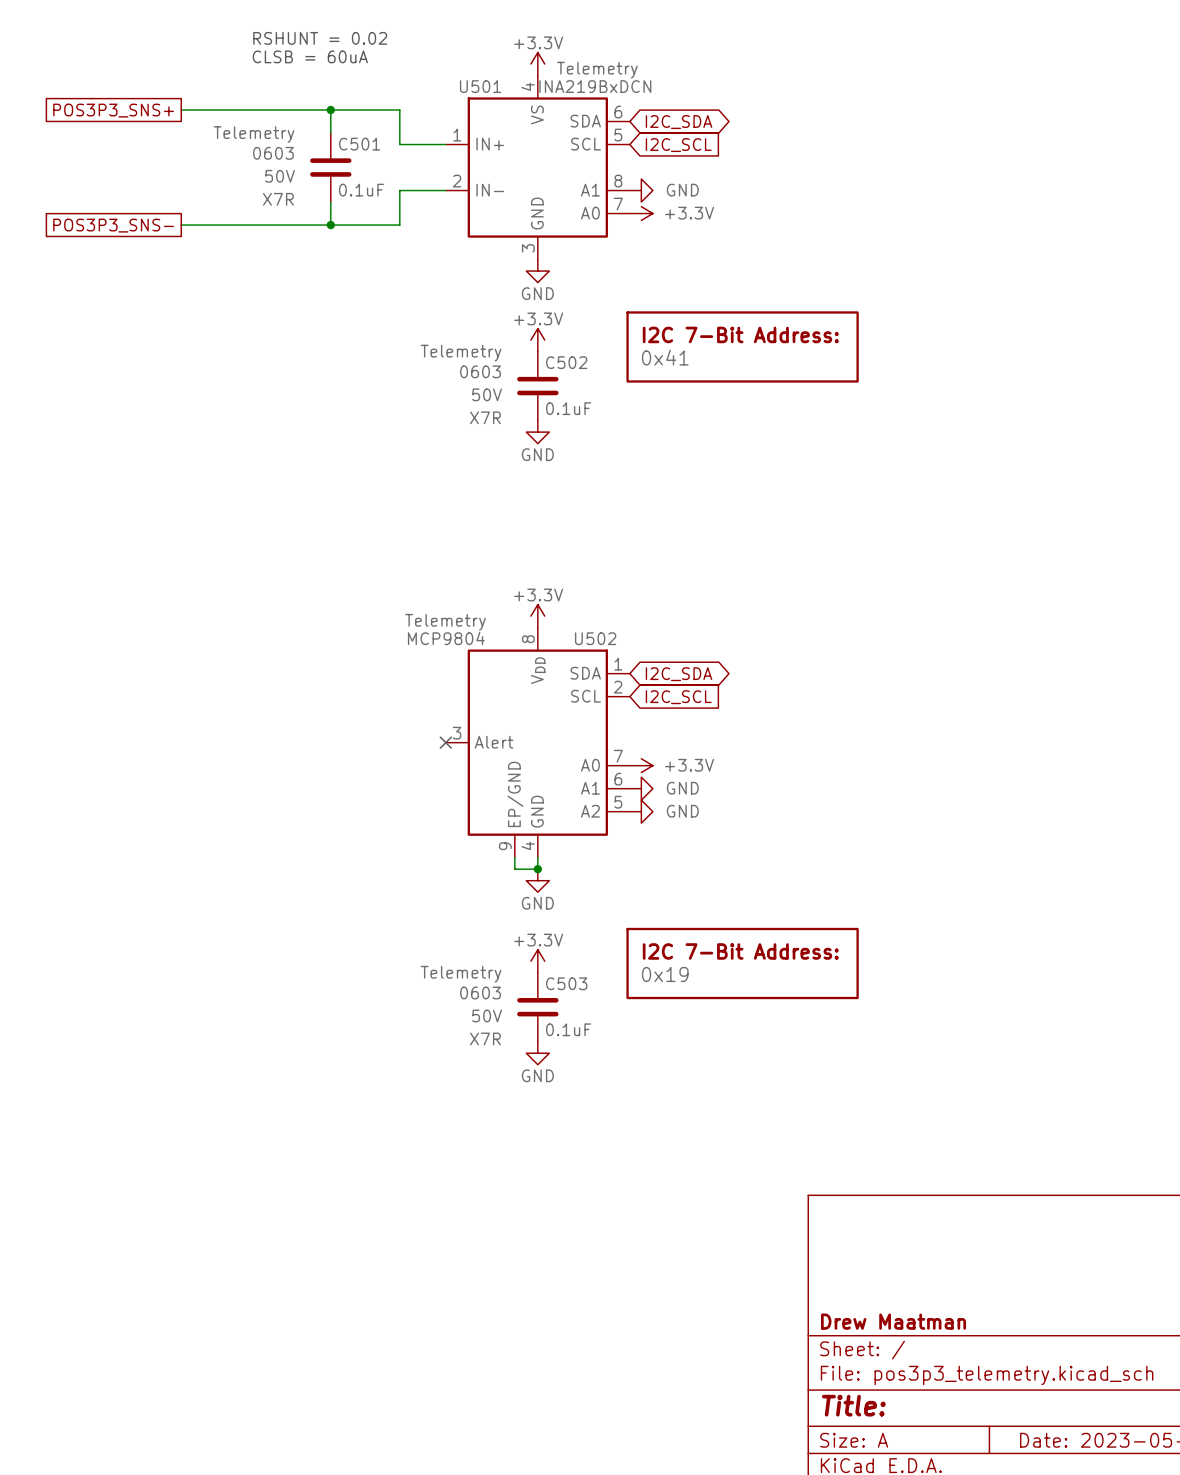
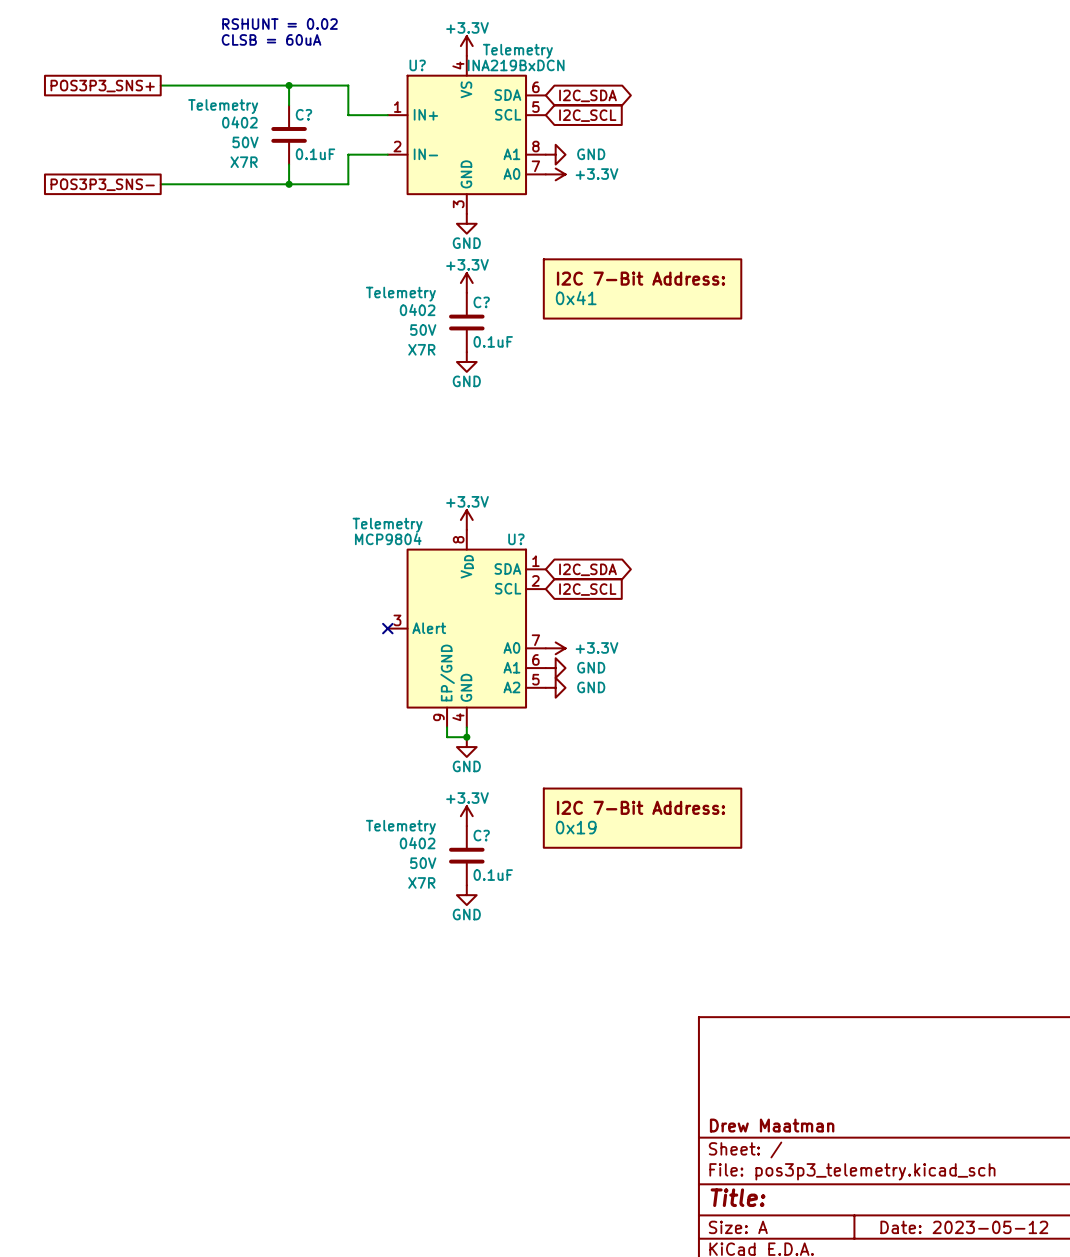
U501 name: U501 (480, 86) -> U? (417, 65)
C501 name: C501 (359, 144) -> C? (303, 114)
C501 text: 0603 (273, 153) -> 0402 (239, 122)
C502 name: C502 (566, 362) -> C? (481, 302)
C502 text: 0603 (480, 371) -> 0402 (417, 310)
U502 name: U502 (595, 638) -> U? (516, 539)
C503 name: C503 (566, 983) -> C? (481, 835)
C503 text: 0603 (480, 992) -> 0402 (417, 843)

